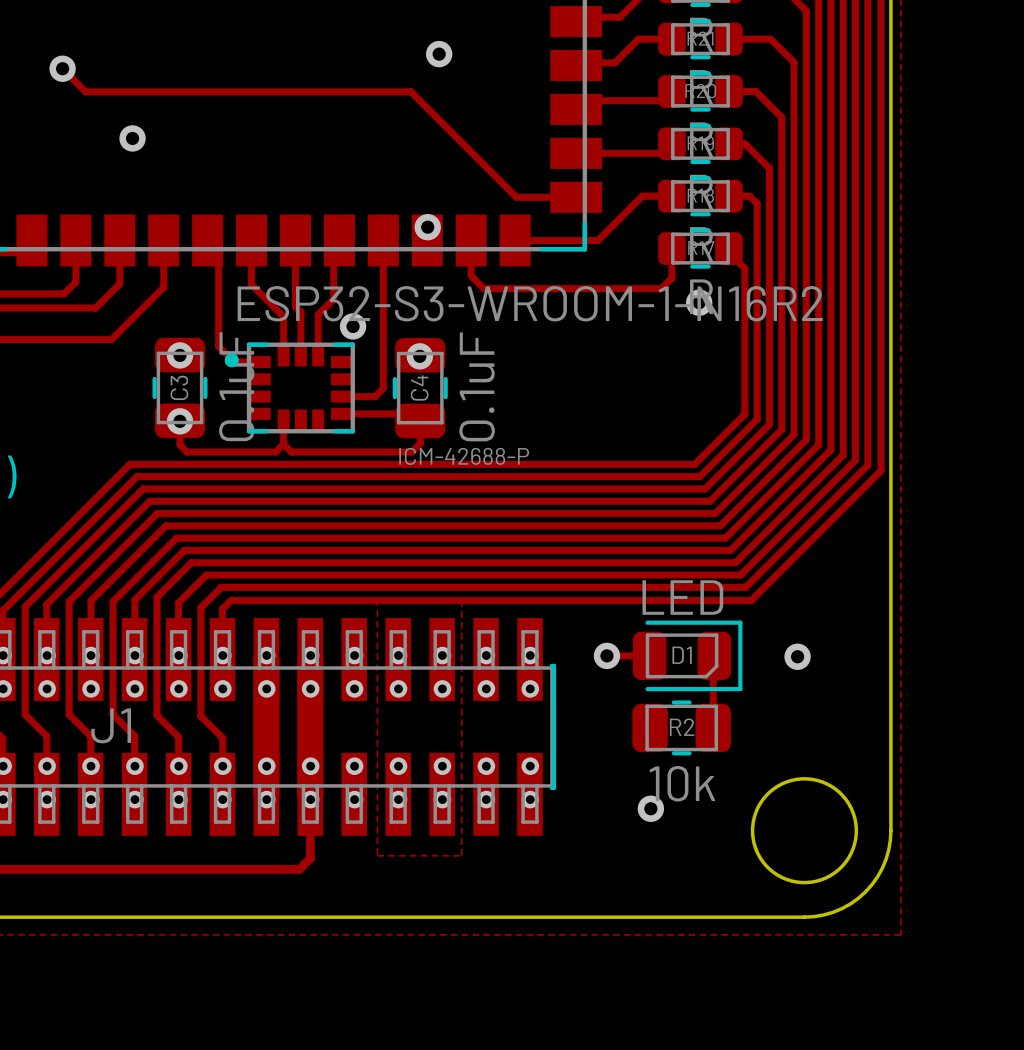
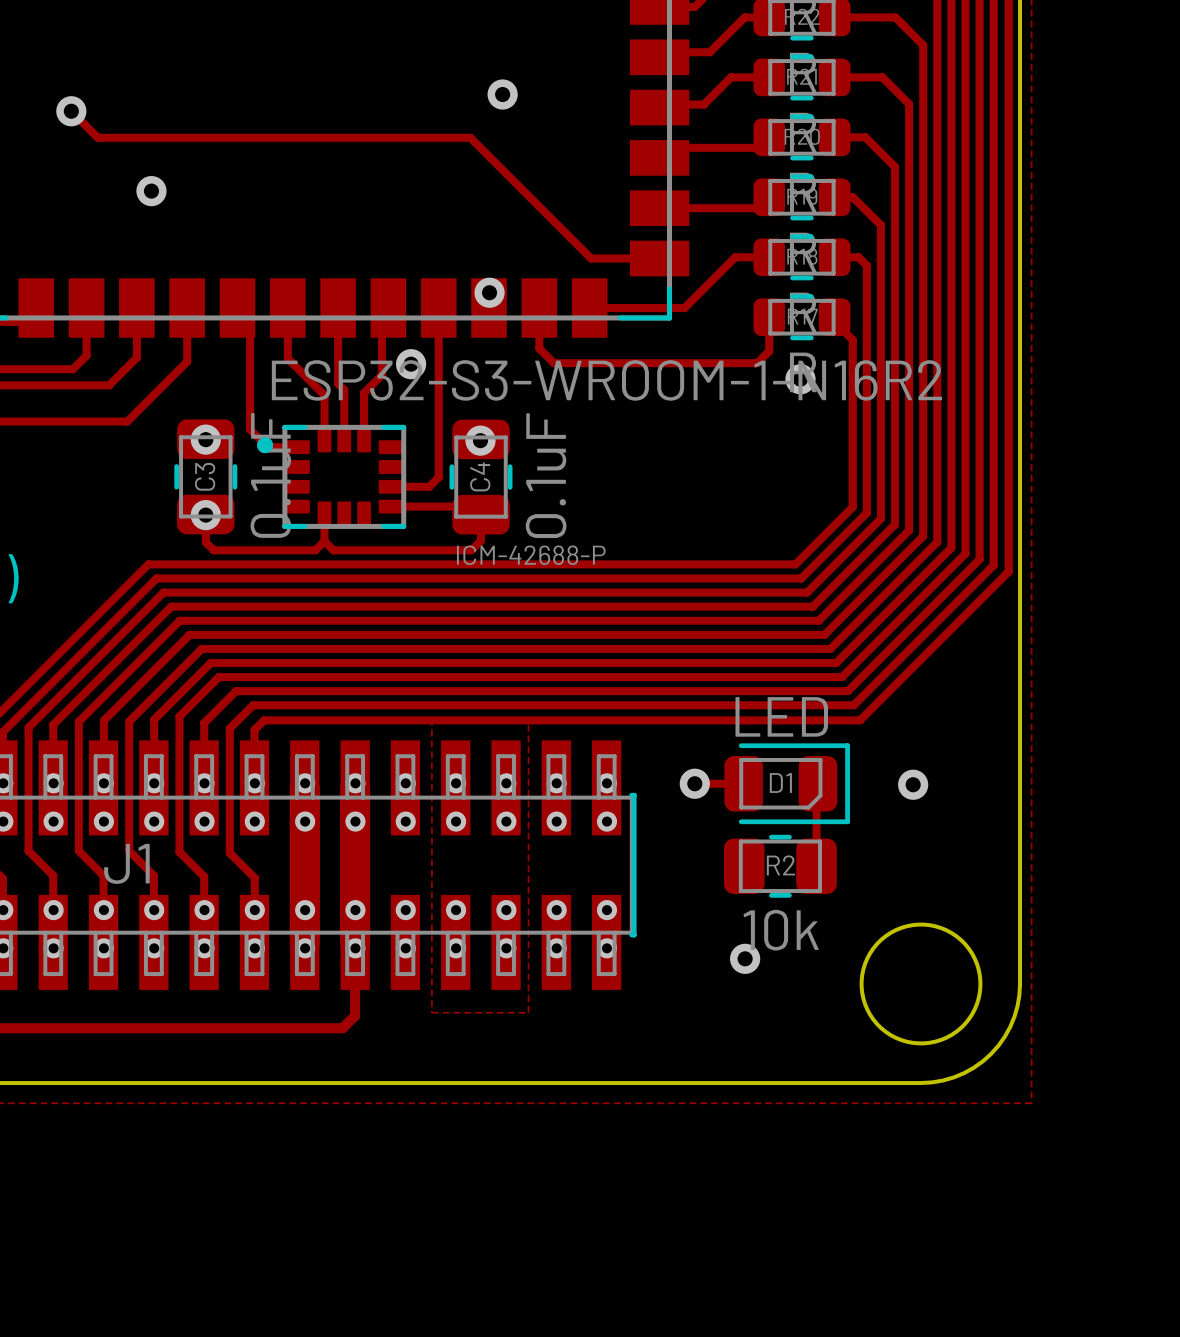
via position: (353, 326) -> (411, 364)

